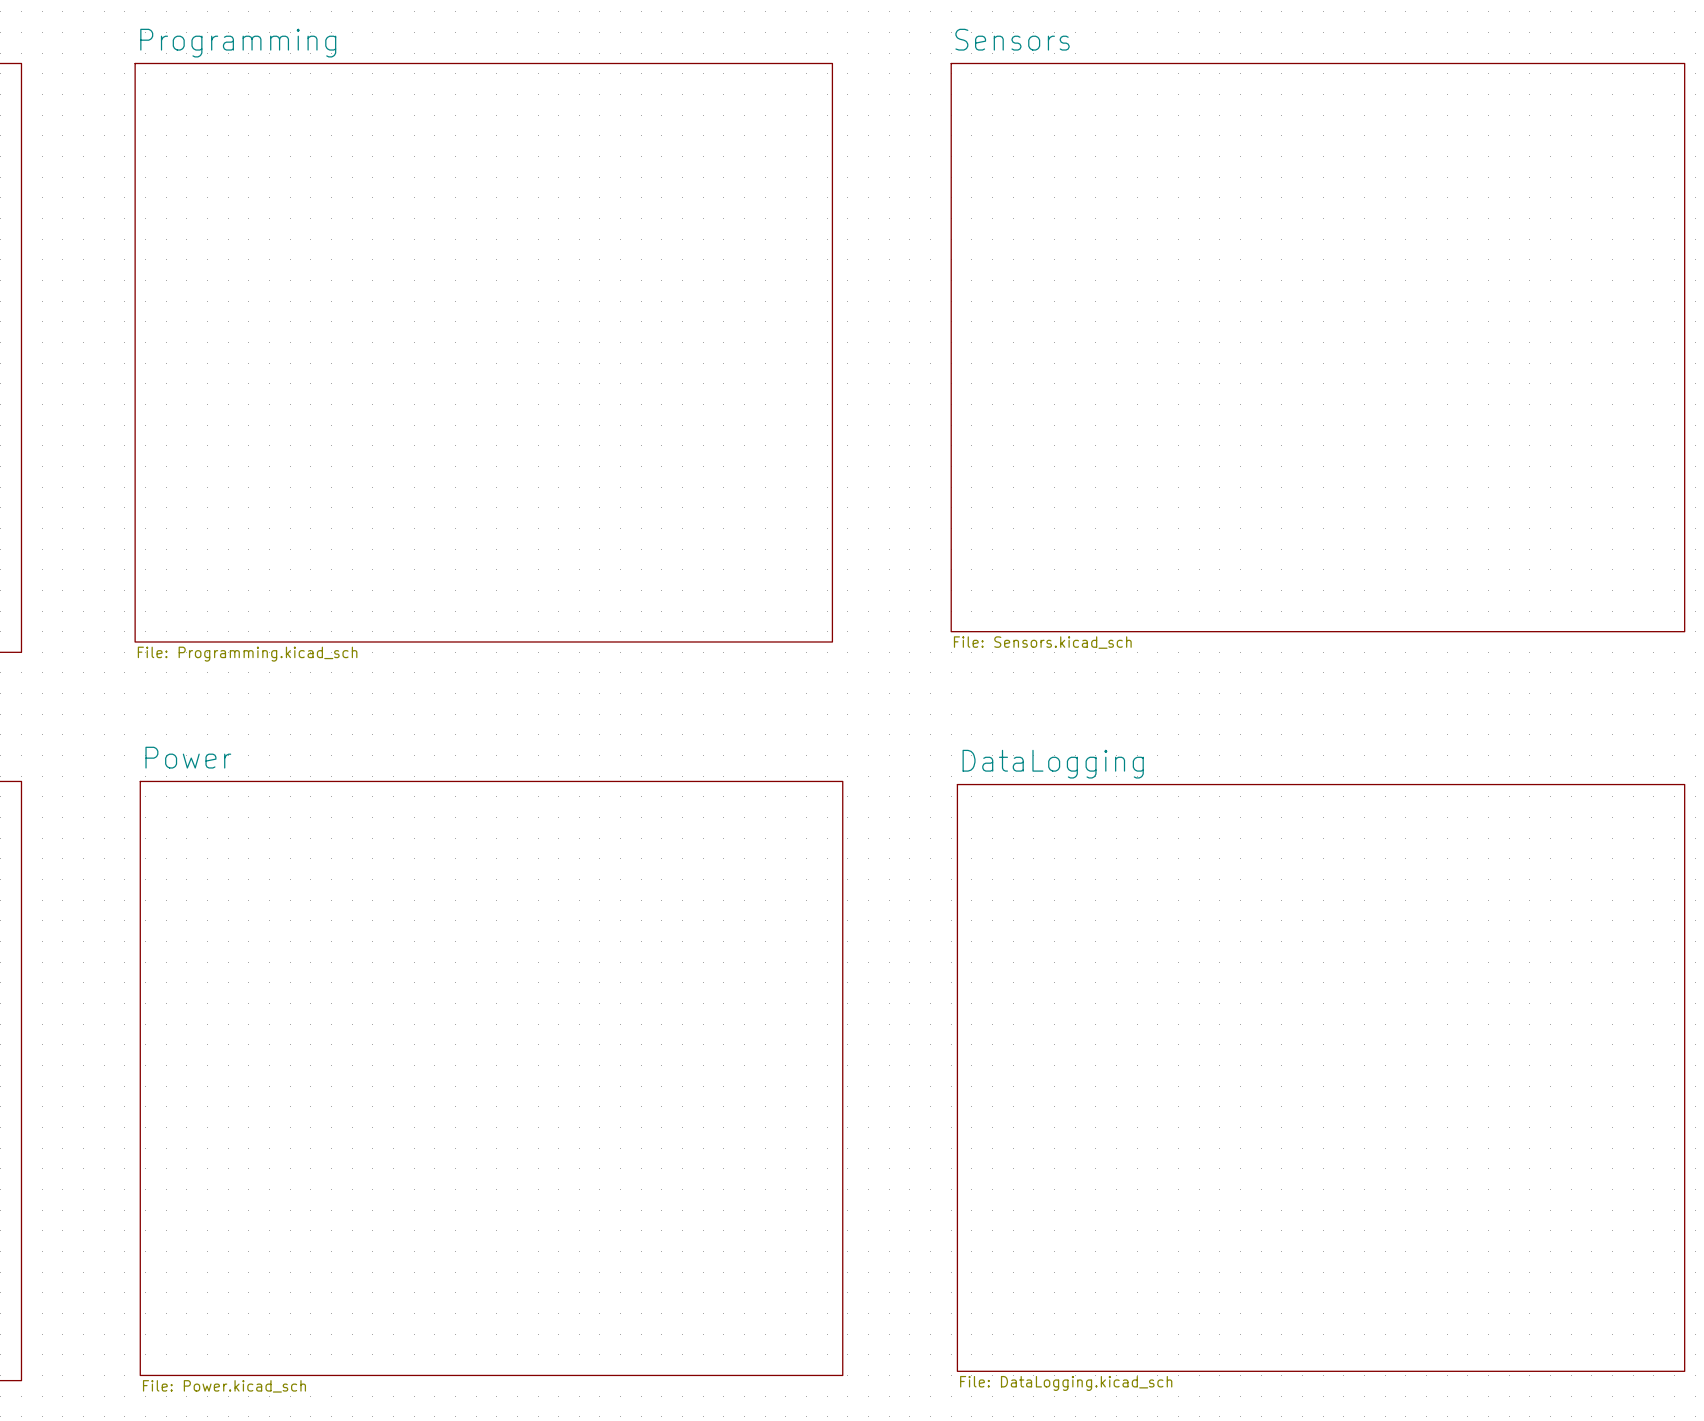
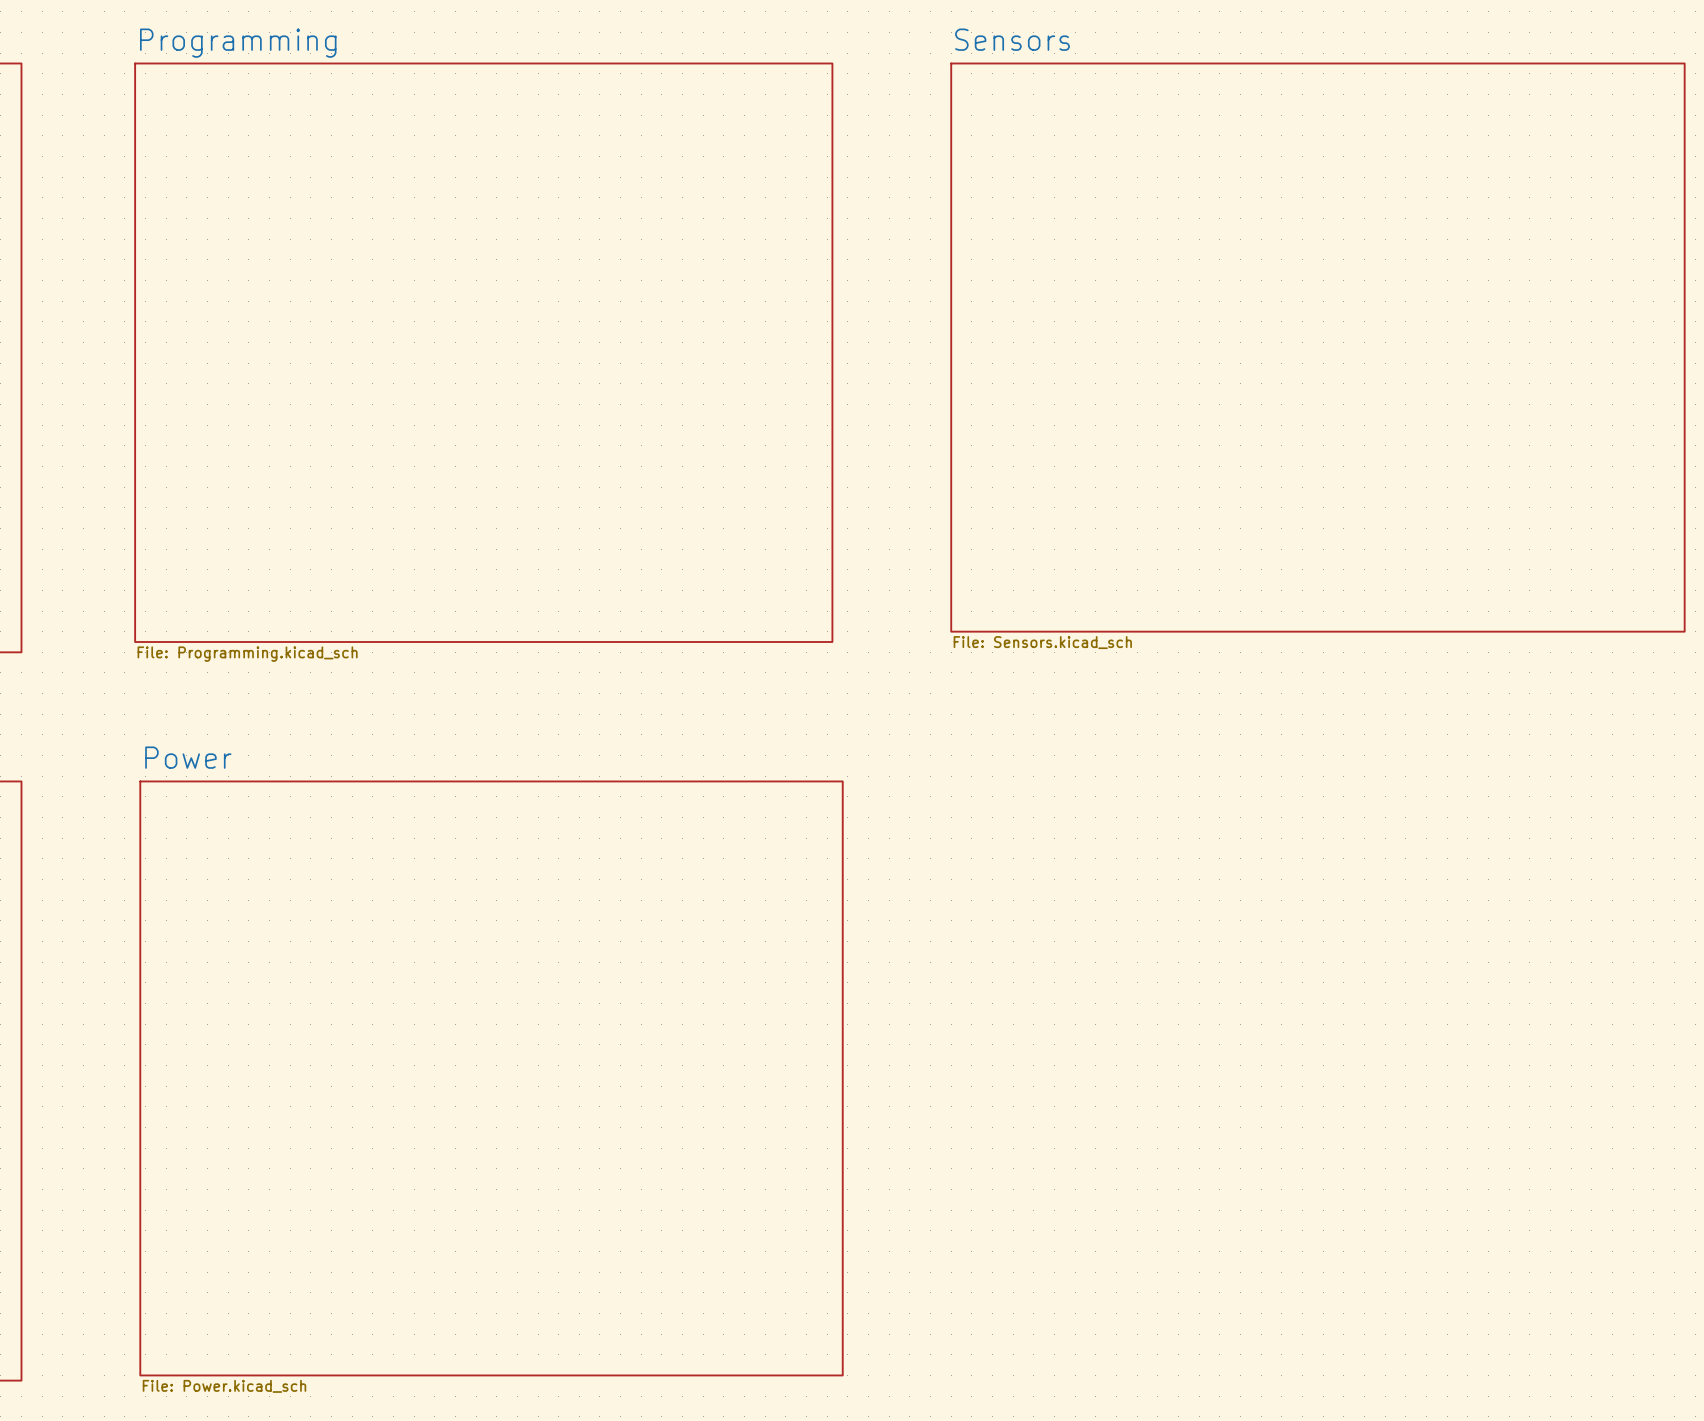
sheet DataLogging: File: DataLogging.kicad_sch (1321, 1077) -> none

